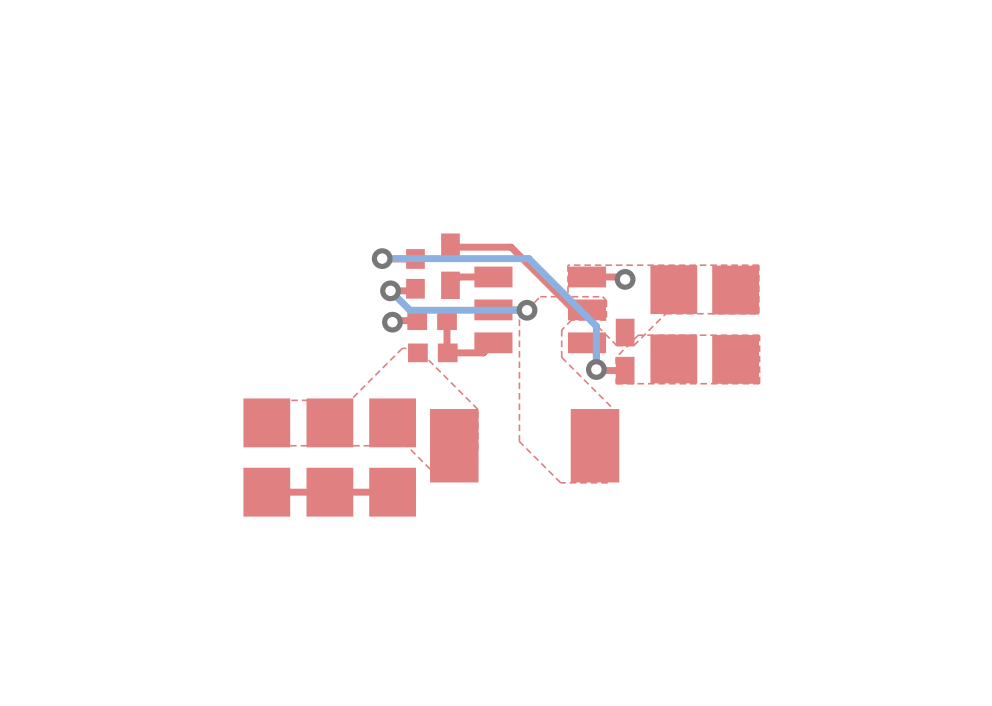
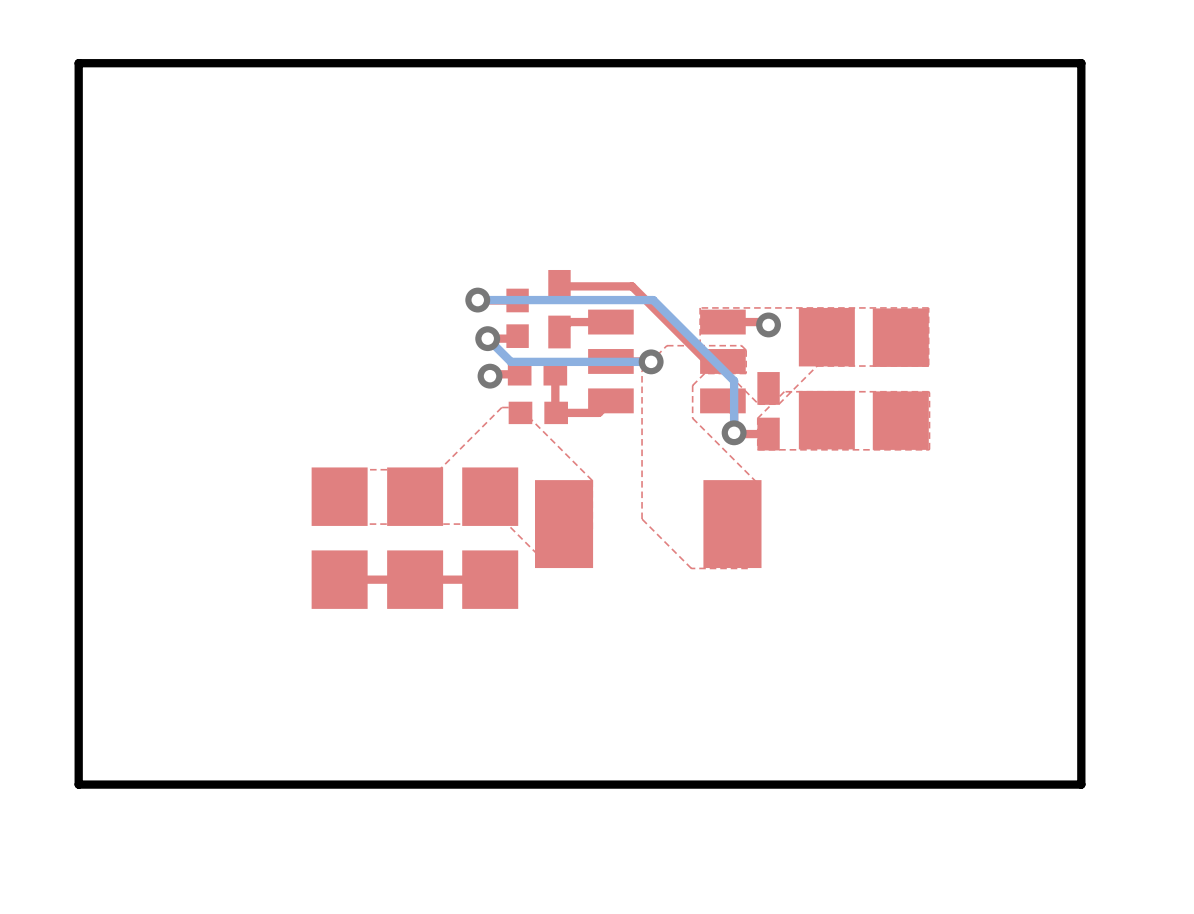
board edge: none -> (1081, 63) (78, 63) (78, 784) (1081, 784) (1081, 63)

